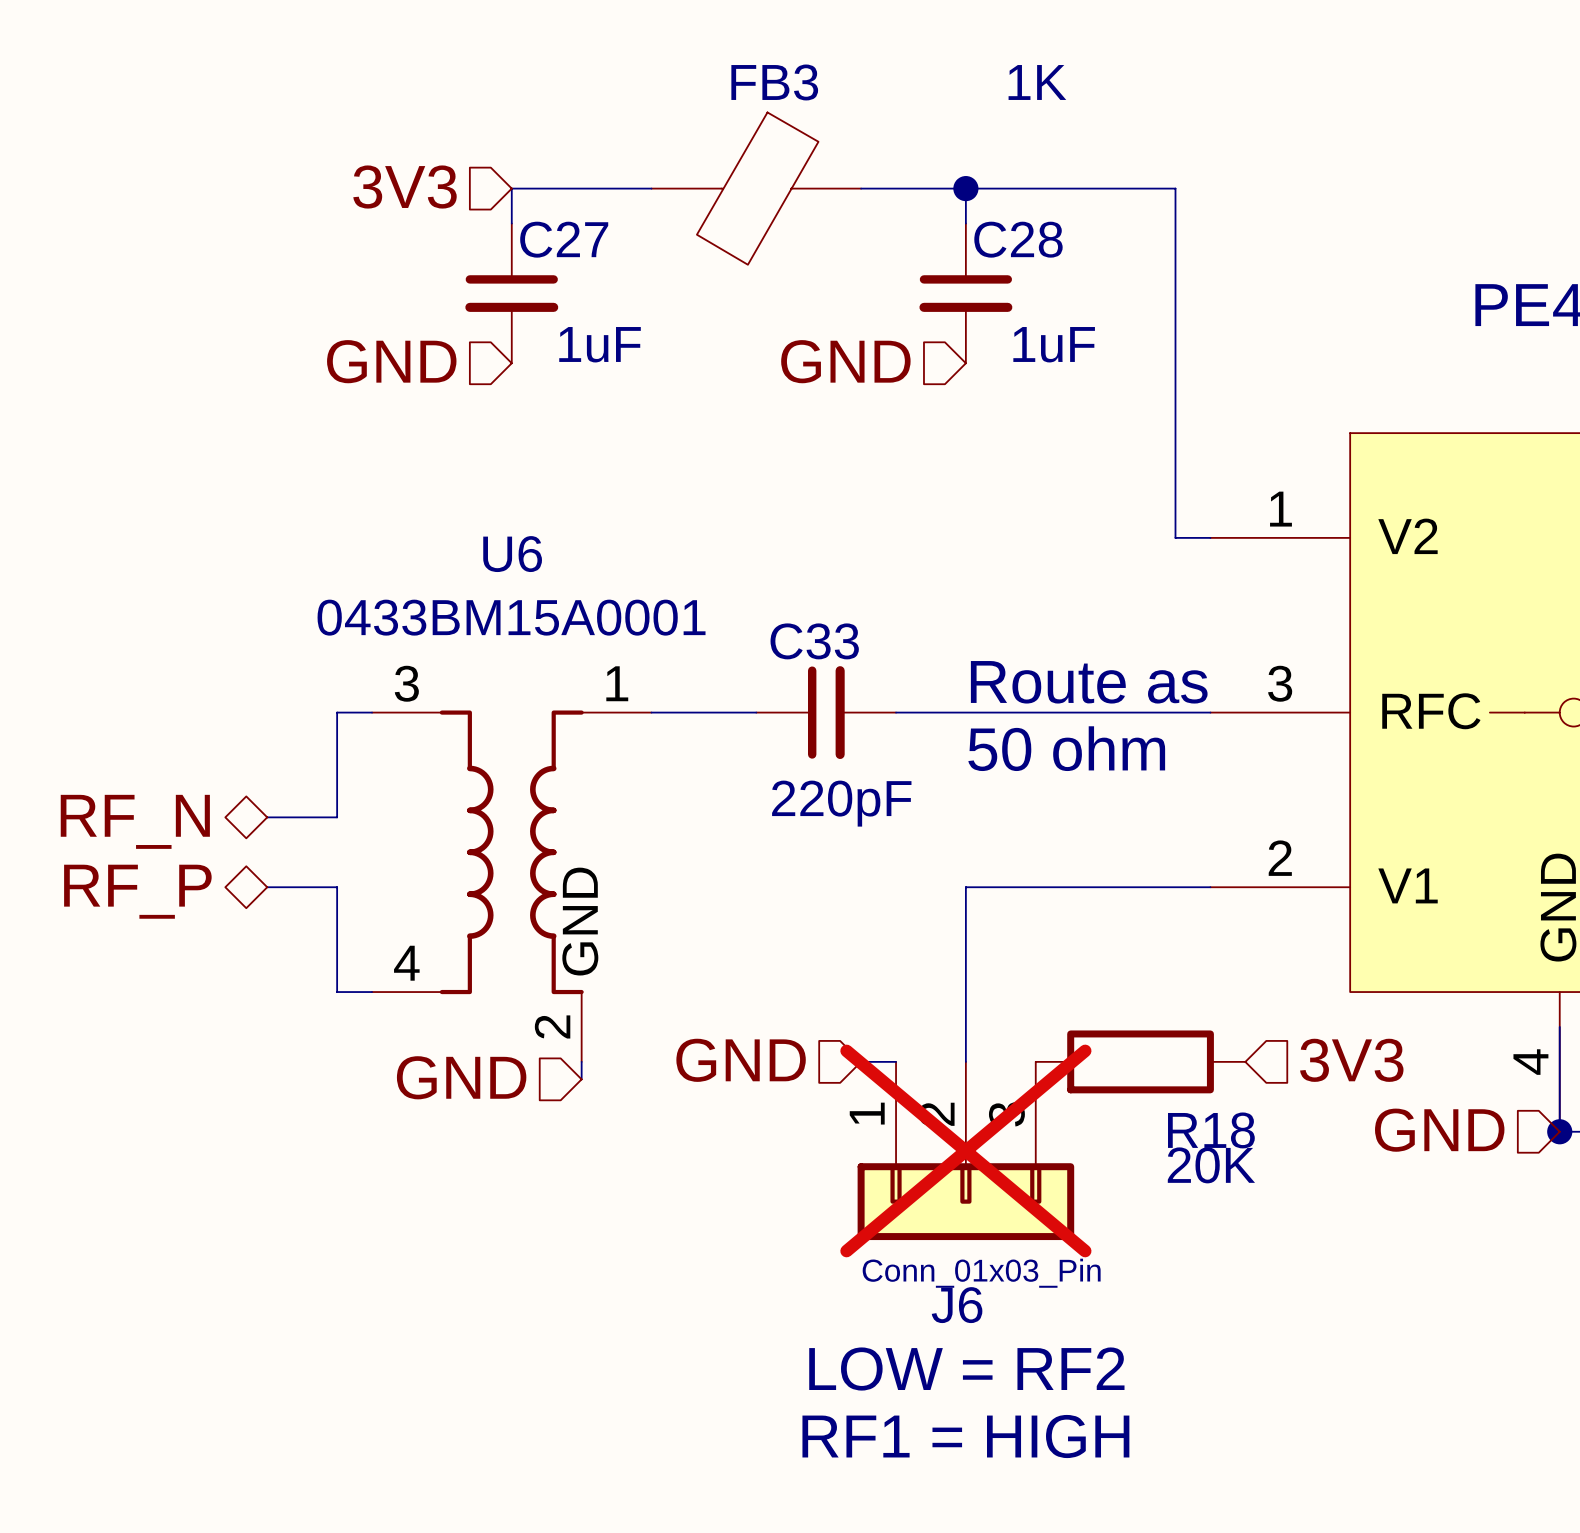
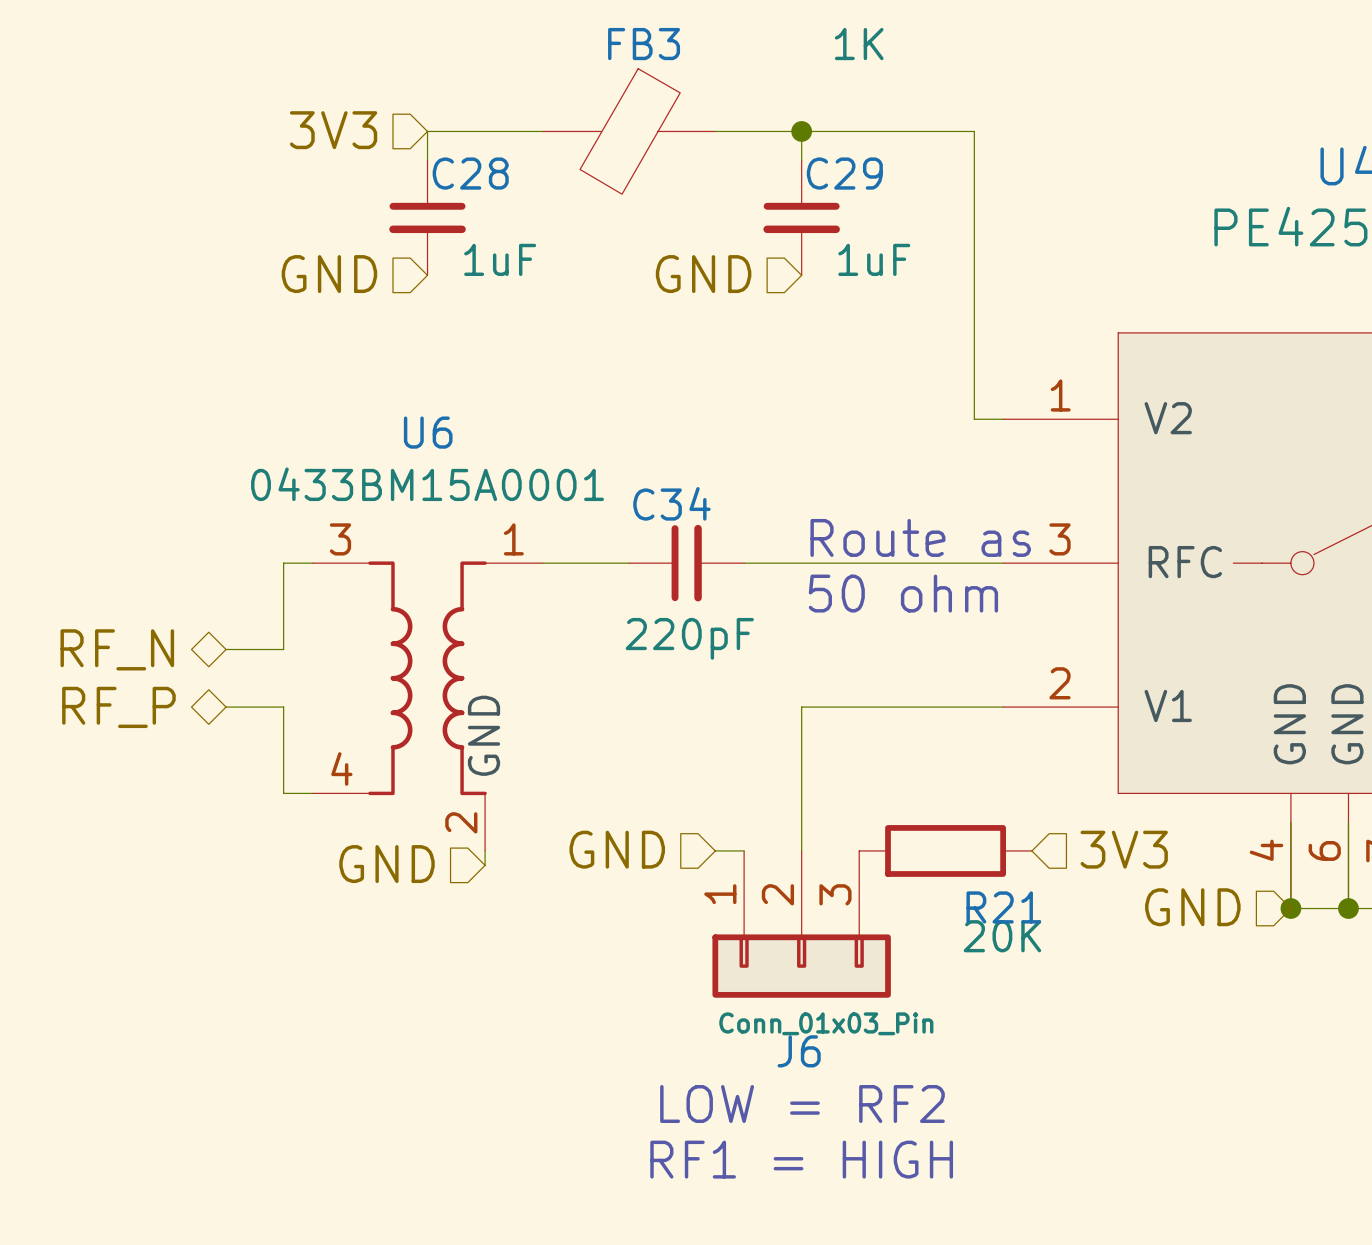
C27 name: C27 (564, 239) -> C28 (470, 173)
C28 name: C28 (1018, 239) -> C29 (844, 173)
C33 name: C33 (814, 641) -> C34 (671, 503)
R18 name: R18 (1211, 1130) -> R21 (1003, 907)
J6 do-not-place cross: (965, 1150) -> none

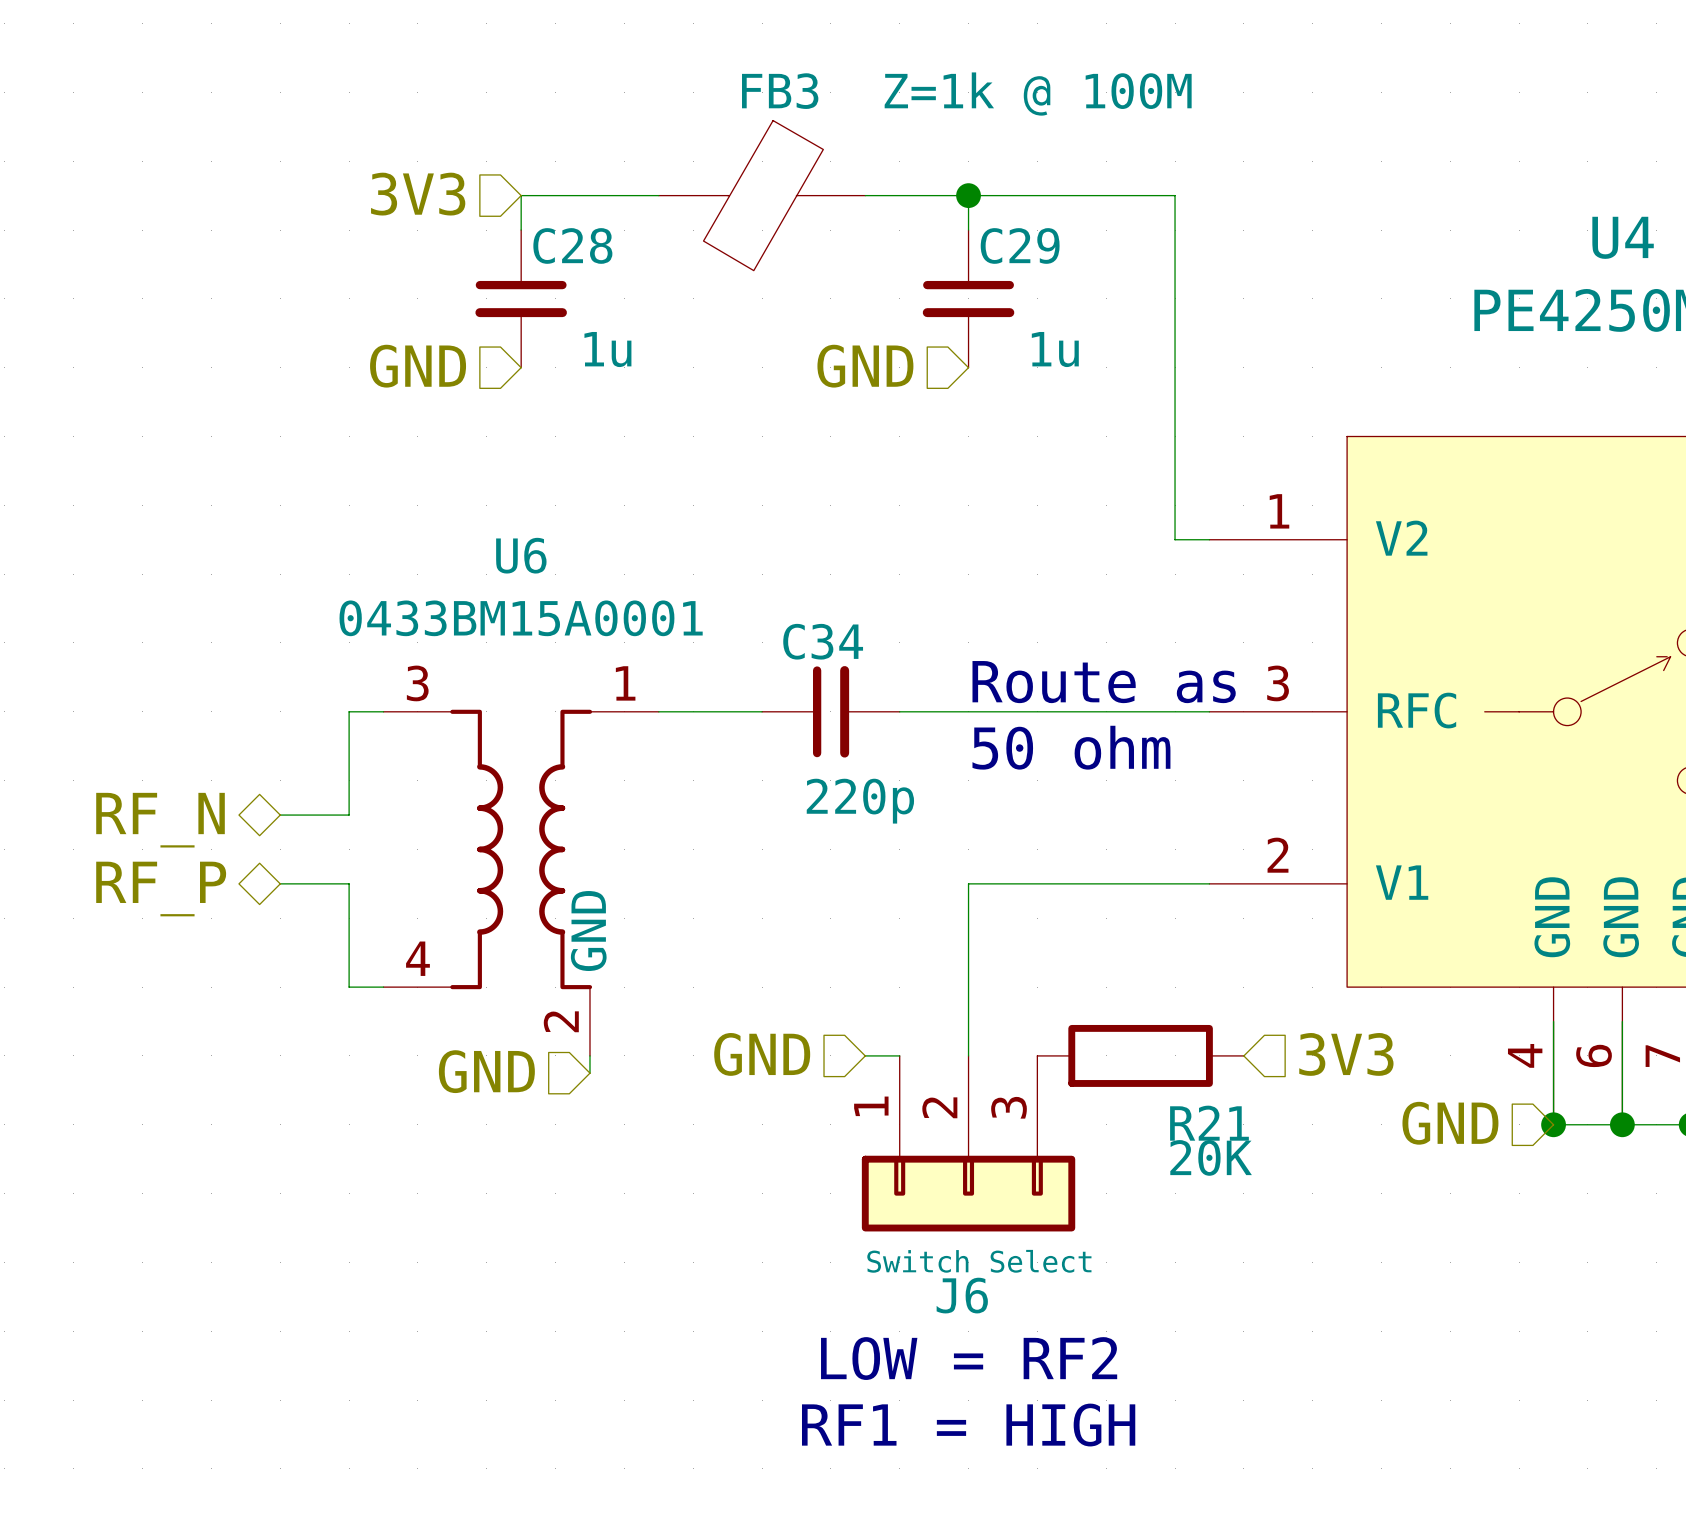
FB3 value: 1K (859, 44) -> Z=1k @ 100M (1038, 94)
C28 value: 1uF (500, 259) -> 1u (607, 349)
C29 value: 1uF (874, 259) -> 1u (1055, 349)
C34 value: 220pF (689, 638) -> 220p (860, 801)
J6 value: Conn_01x03_Pin (826, 1023) -> Switch Select (979, 1261)

